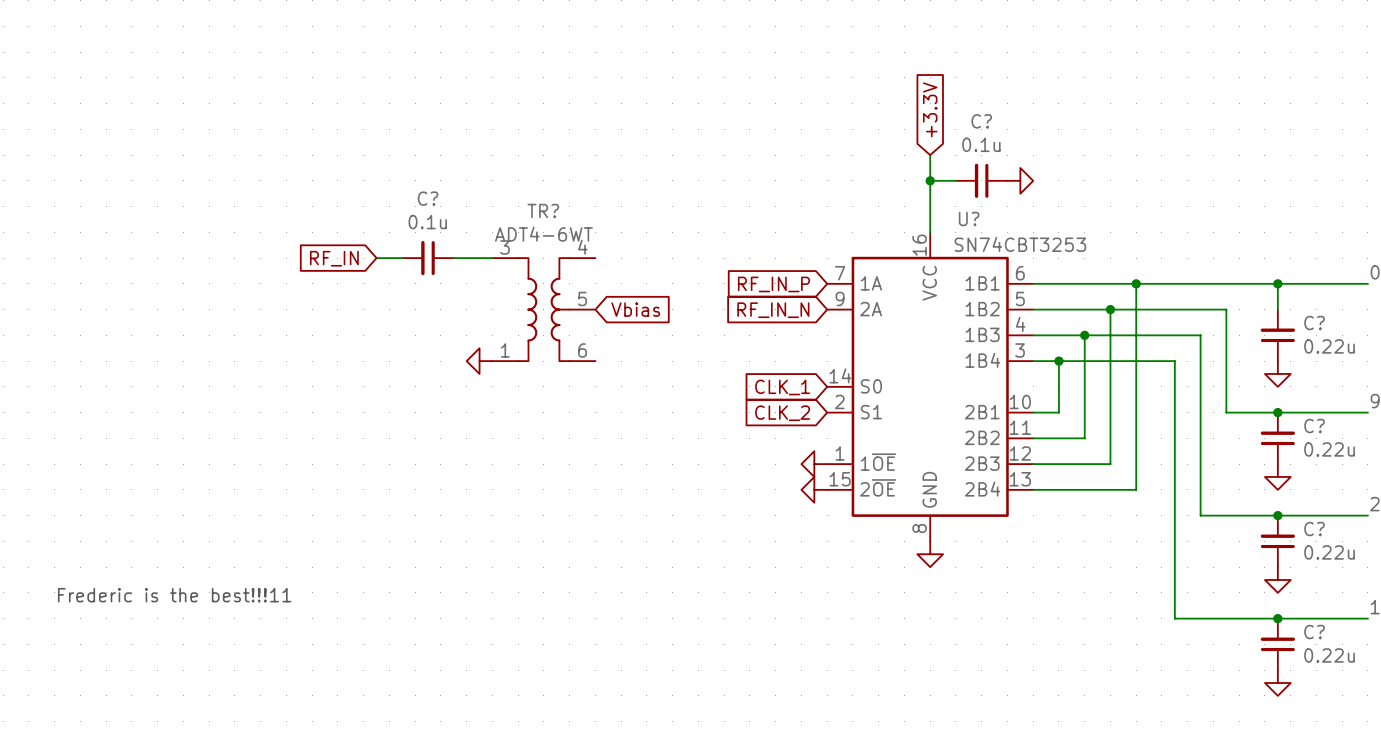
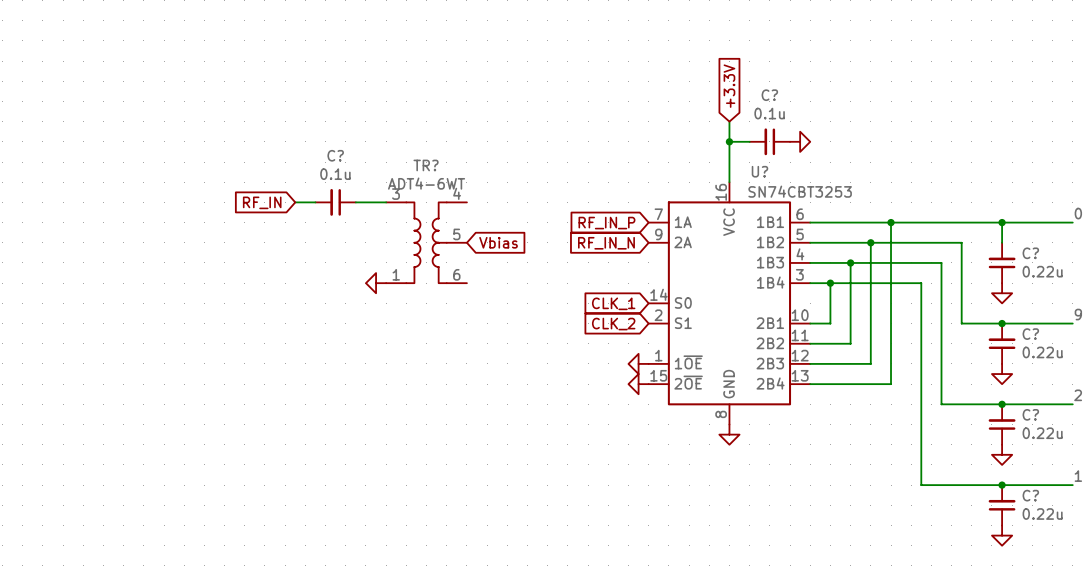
text: Frederic is the best!!!11 (174, 595) -> none

